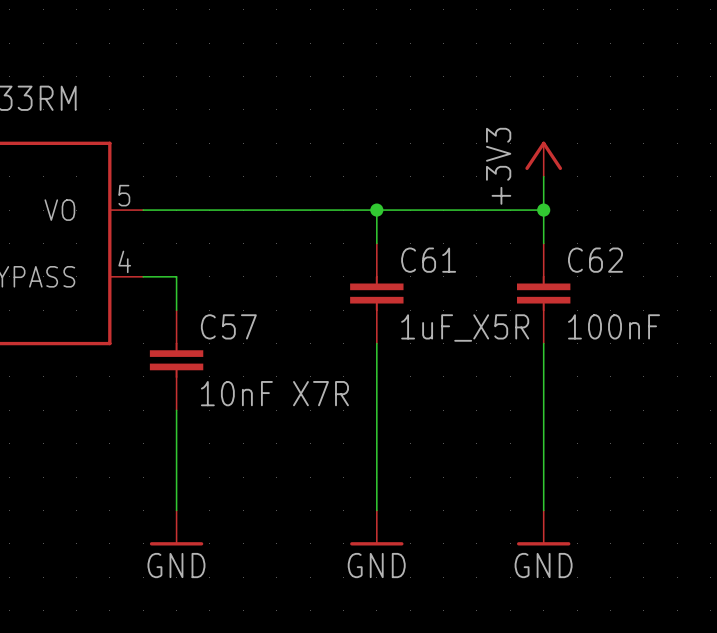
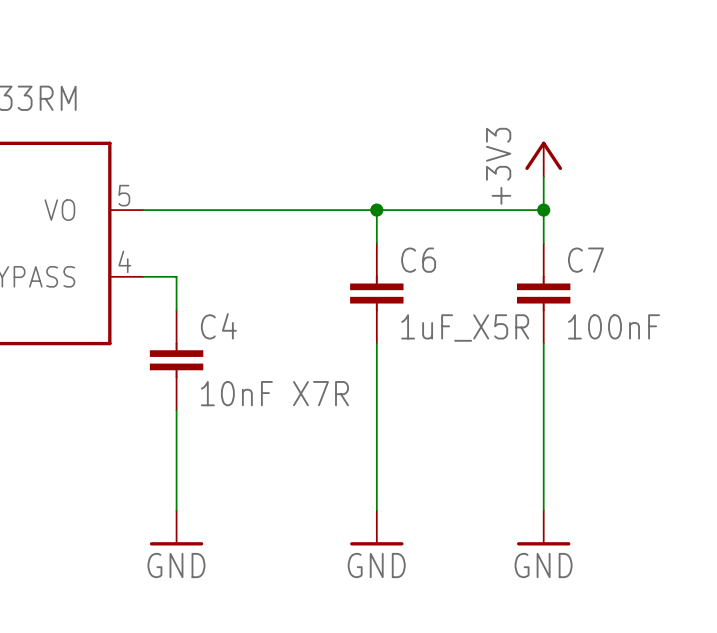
C61 name: C61 (428, 260) -> C6 (418, 260)
C62 name: C62 (595, 260) -> C7 (585, 260)
C57 name: C57 (228, 326) -> C4 (218, 326)

